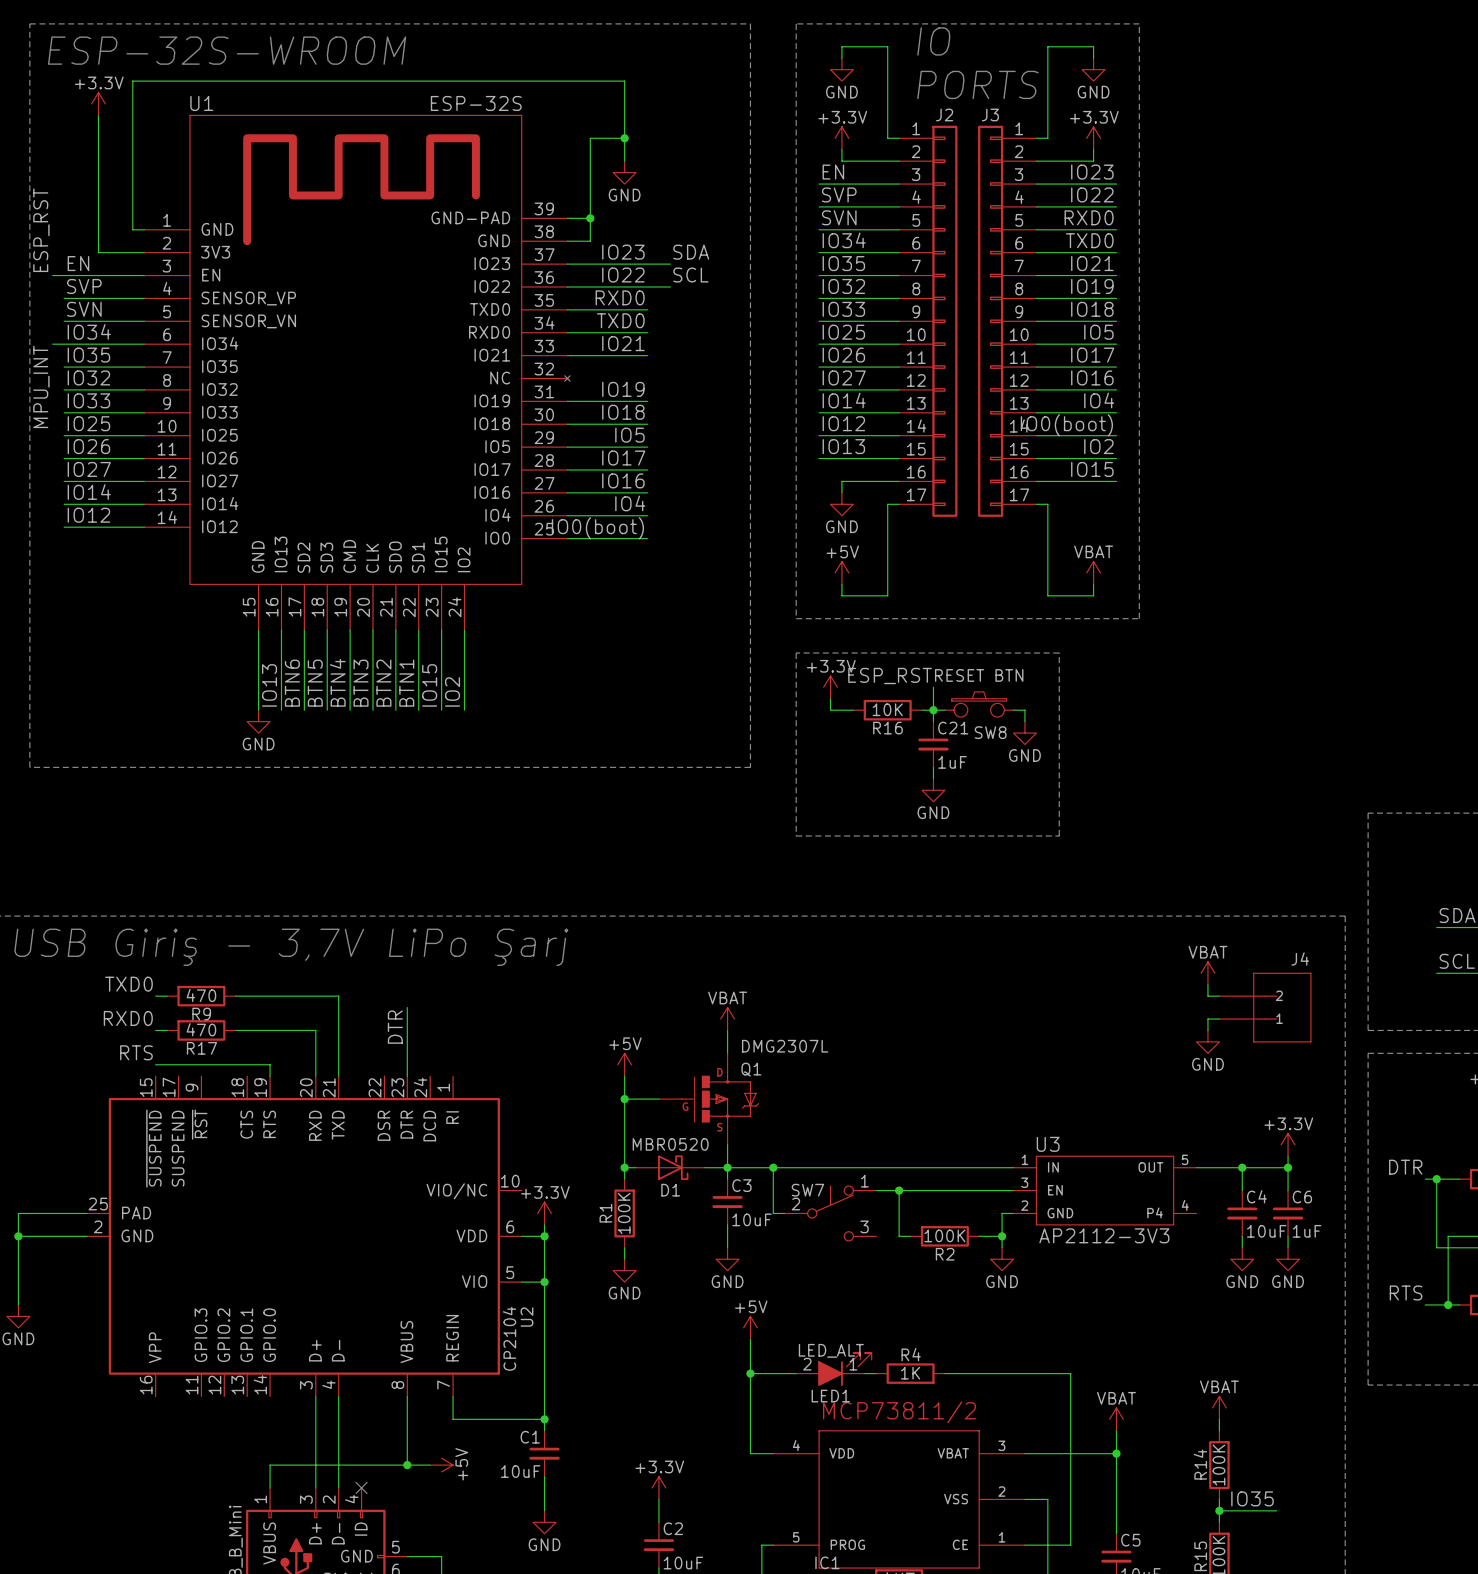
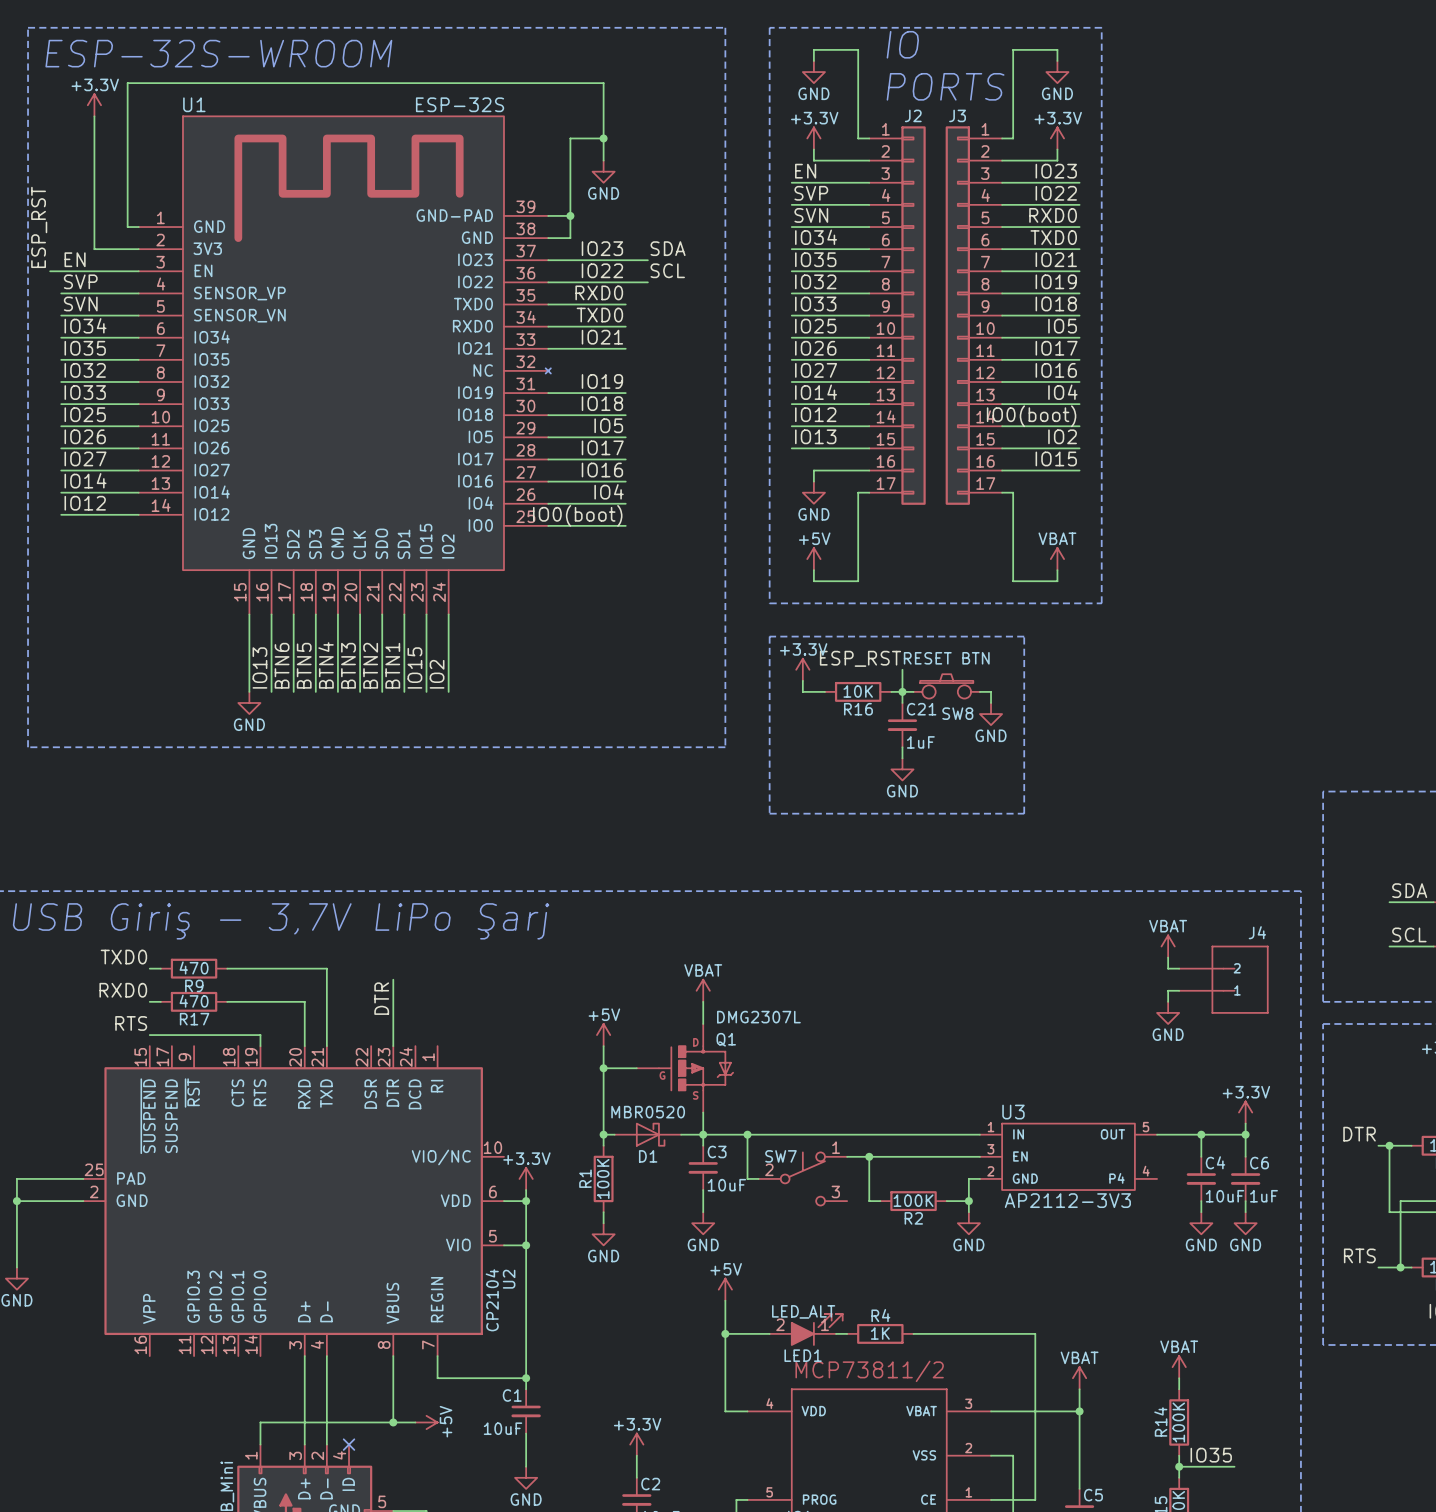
wire: (52, 344) (64, 344) -> none
label: MPU_INT (41, 386) -> none

